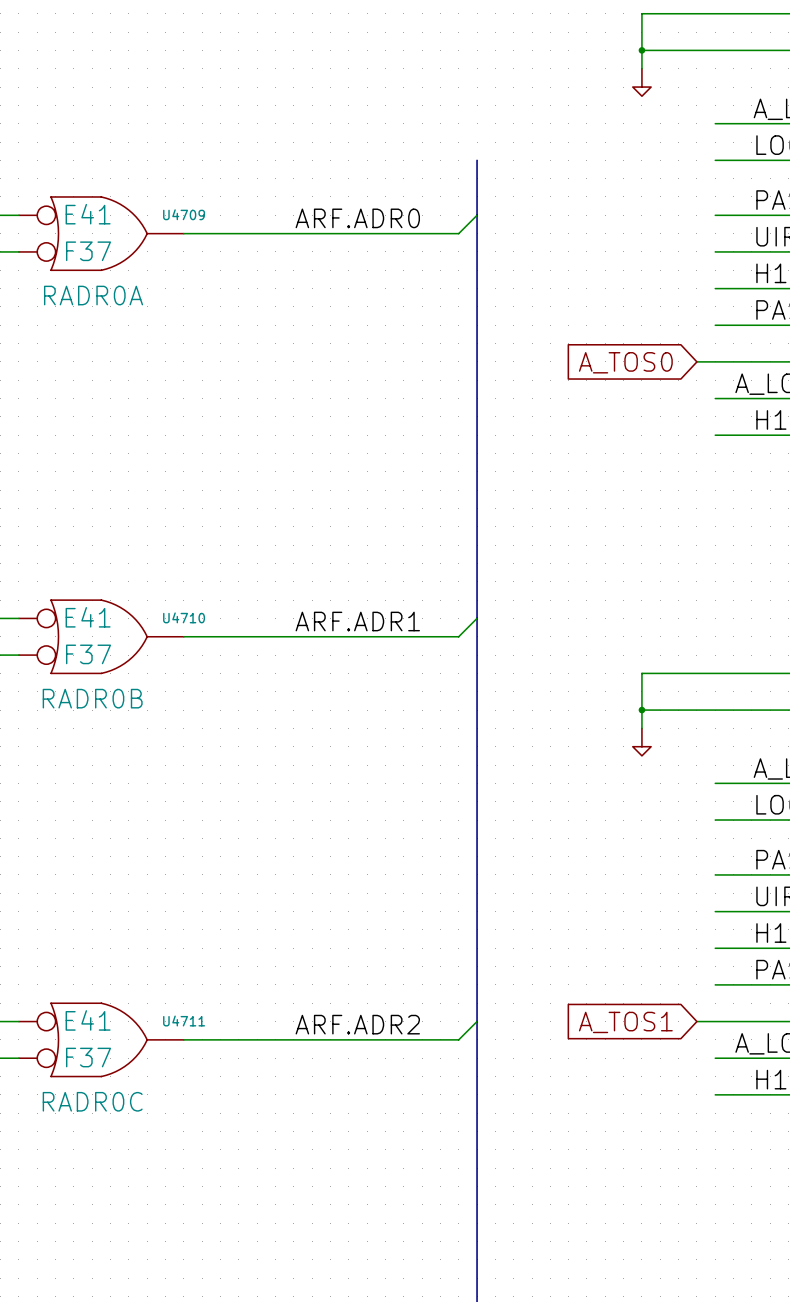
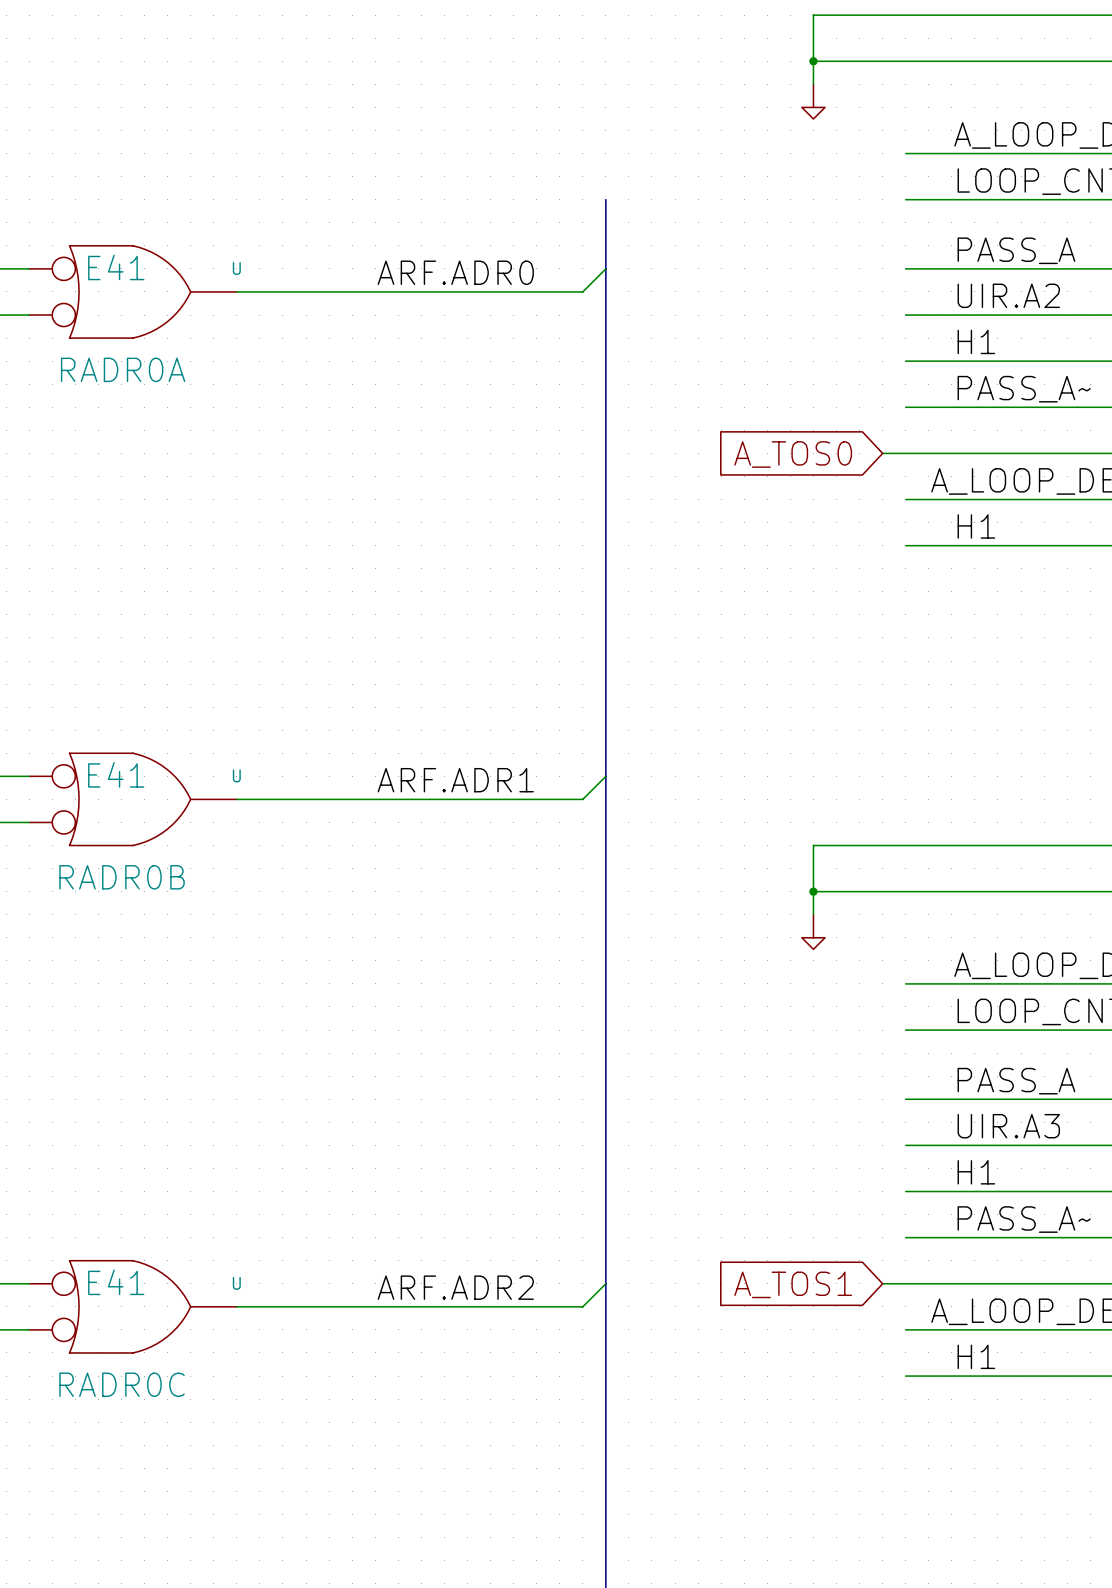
U4709 name: U4709 (184, 214) -> U (236, 268)
U4709 value: F37 (88, 251) -> none
U4710 name: U4710 (184, 617) -> U (236, 775)
U4710 value: F37 (88, 654) -> none
U4711 name: U4711 (184, 1021) -> U (236, 1283)
U4711 value: F37 (88, 1057) -> none

